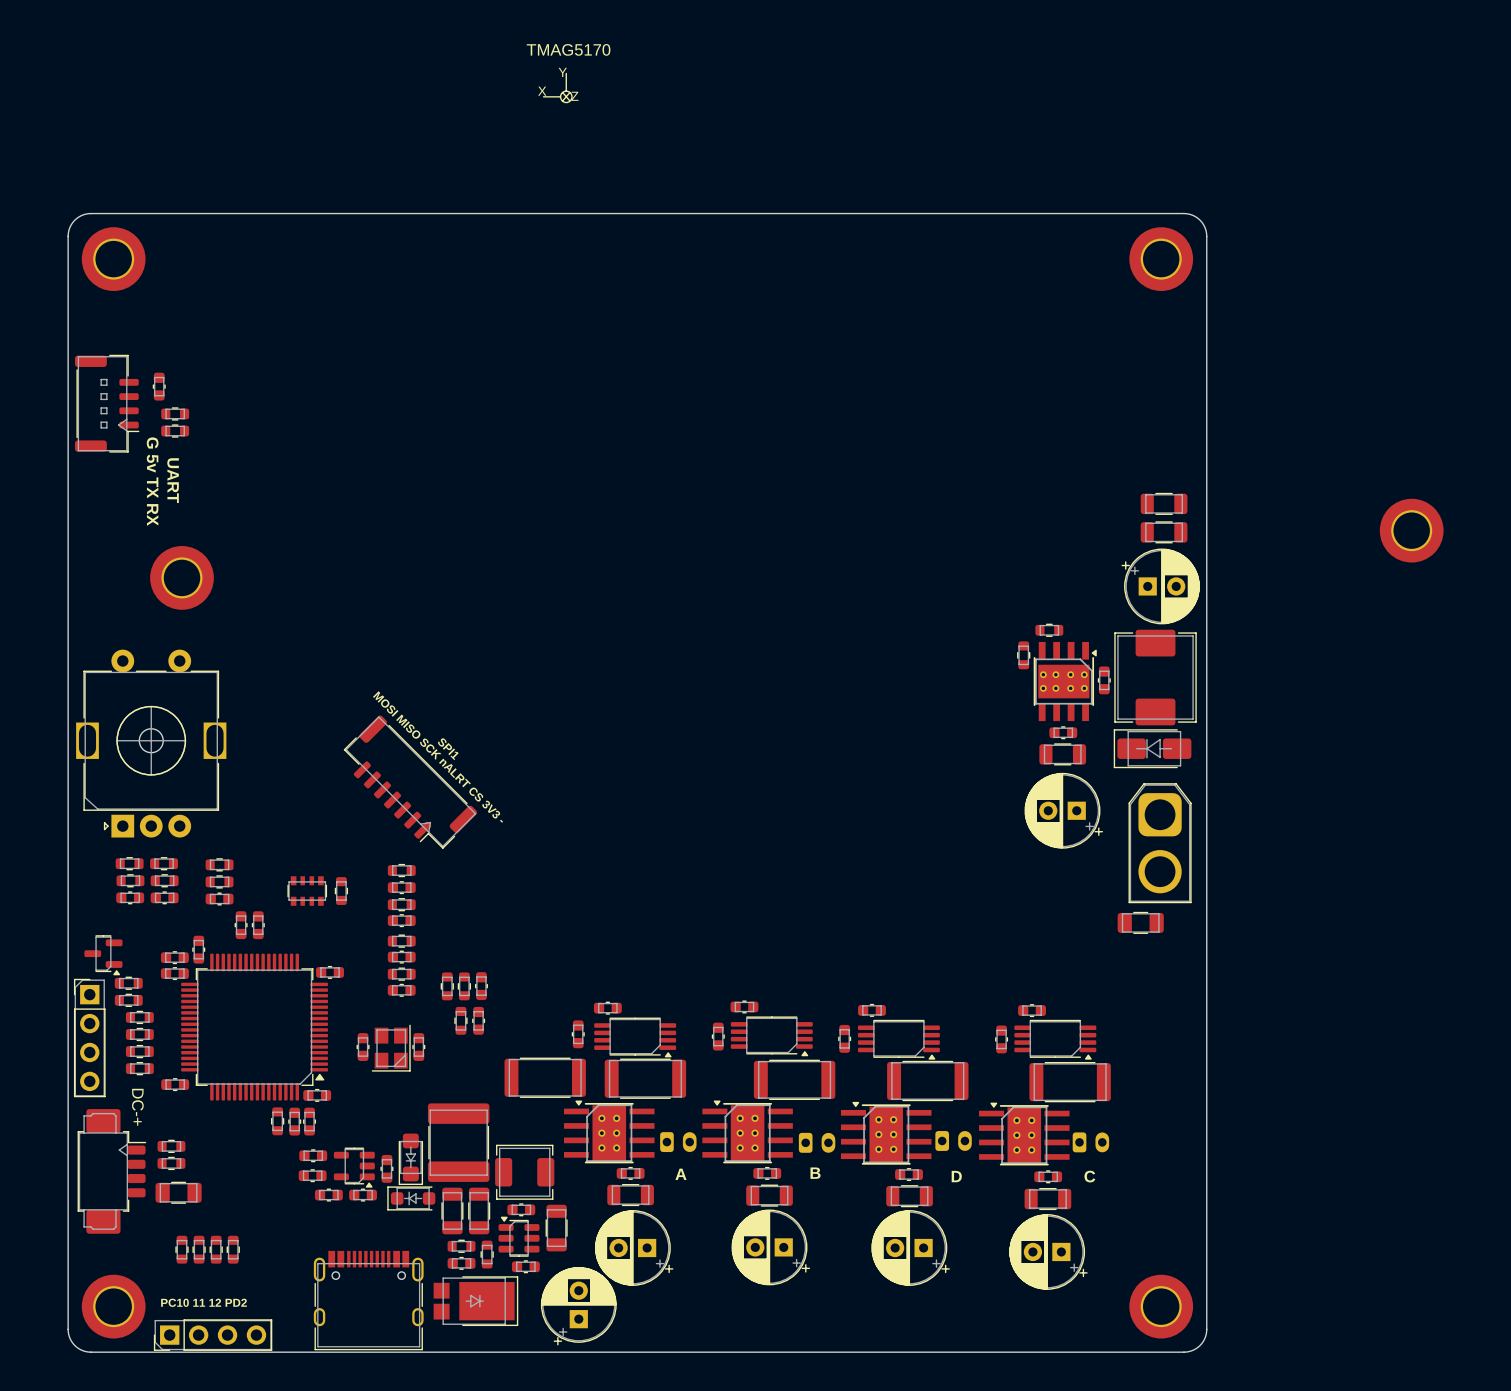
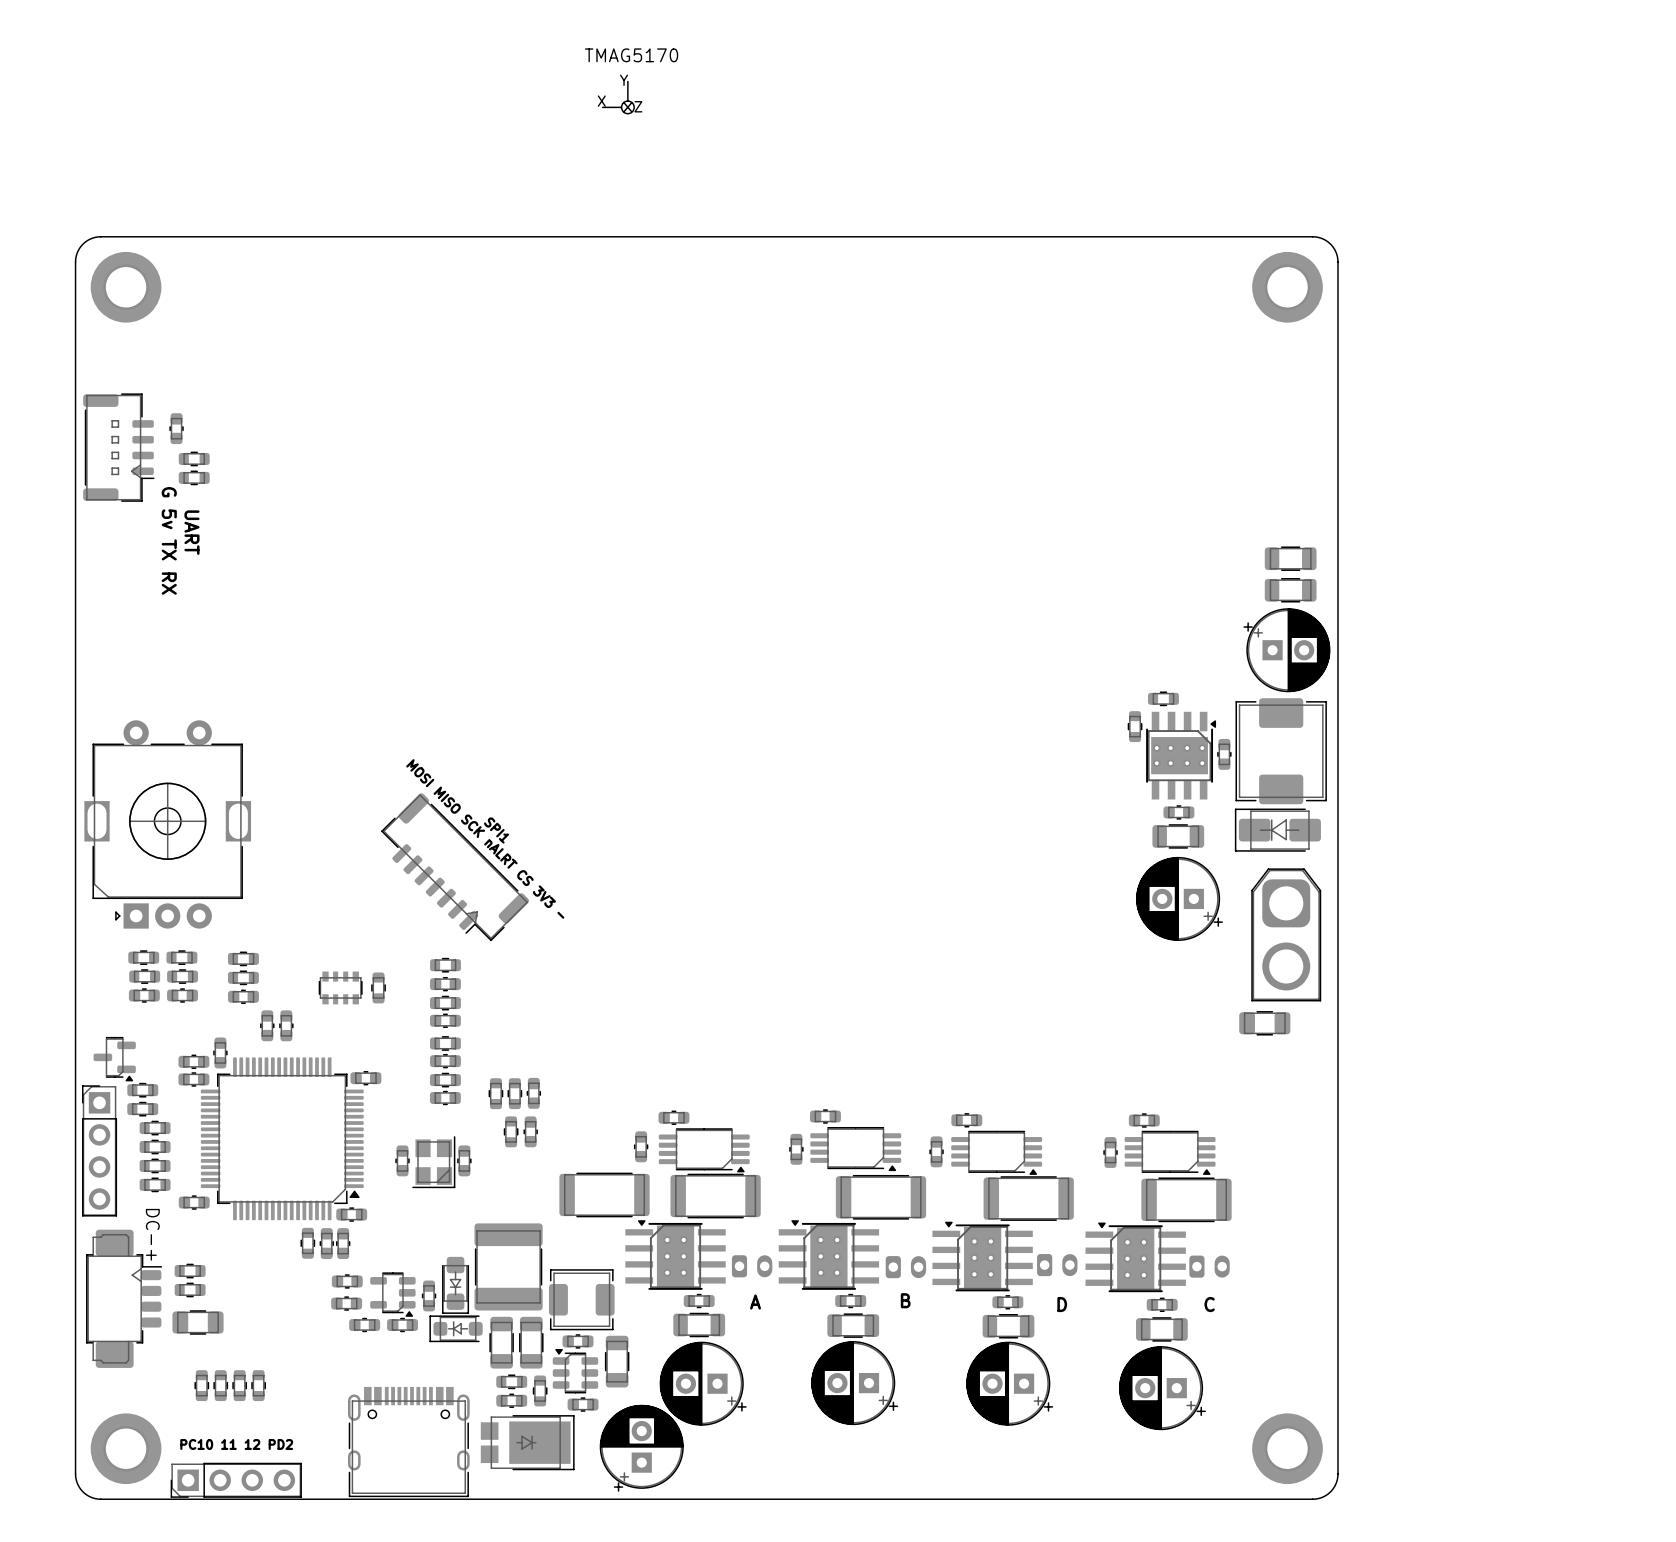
part: (1411, 530) -> none
part: (182, 577) -> none

